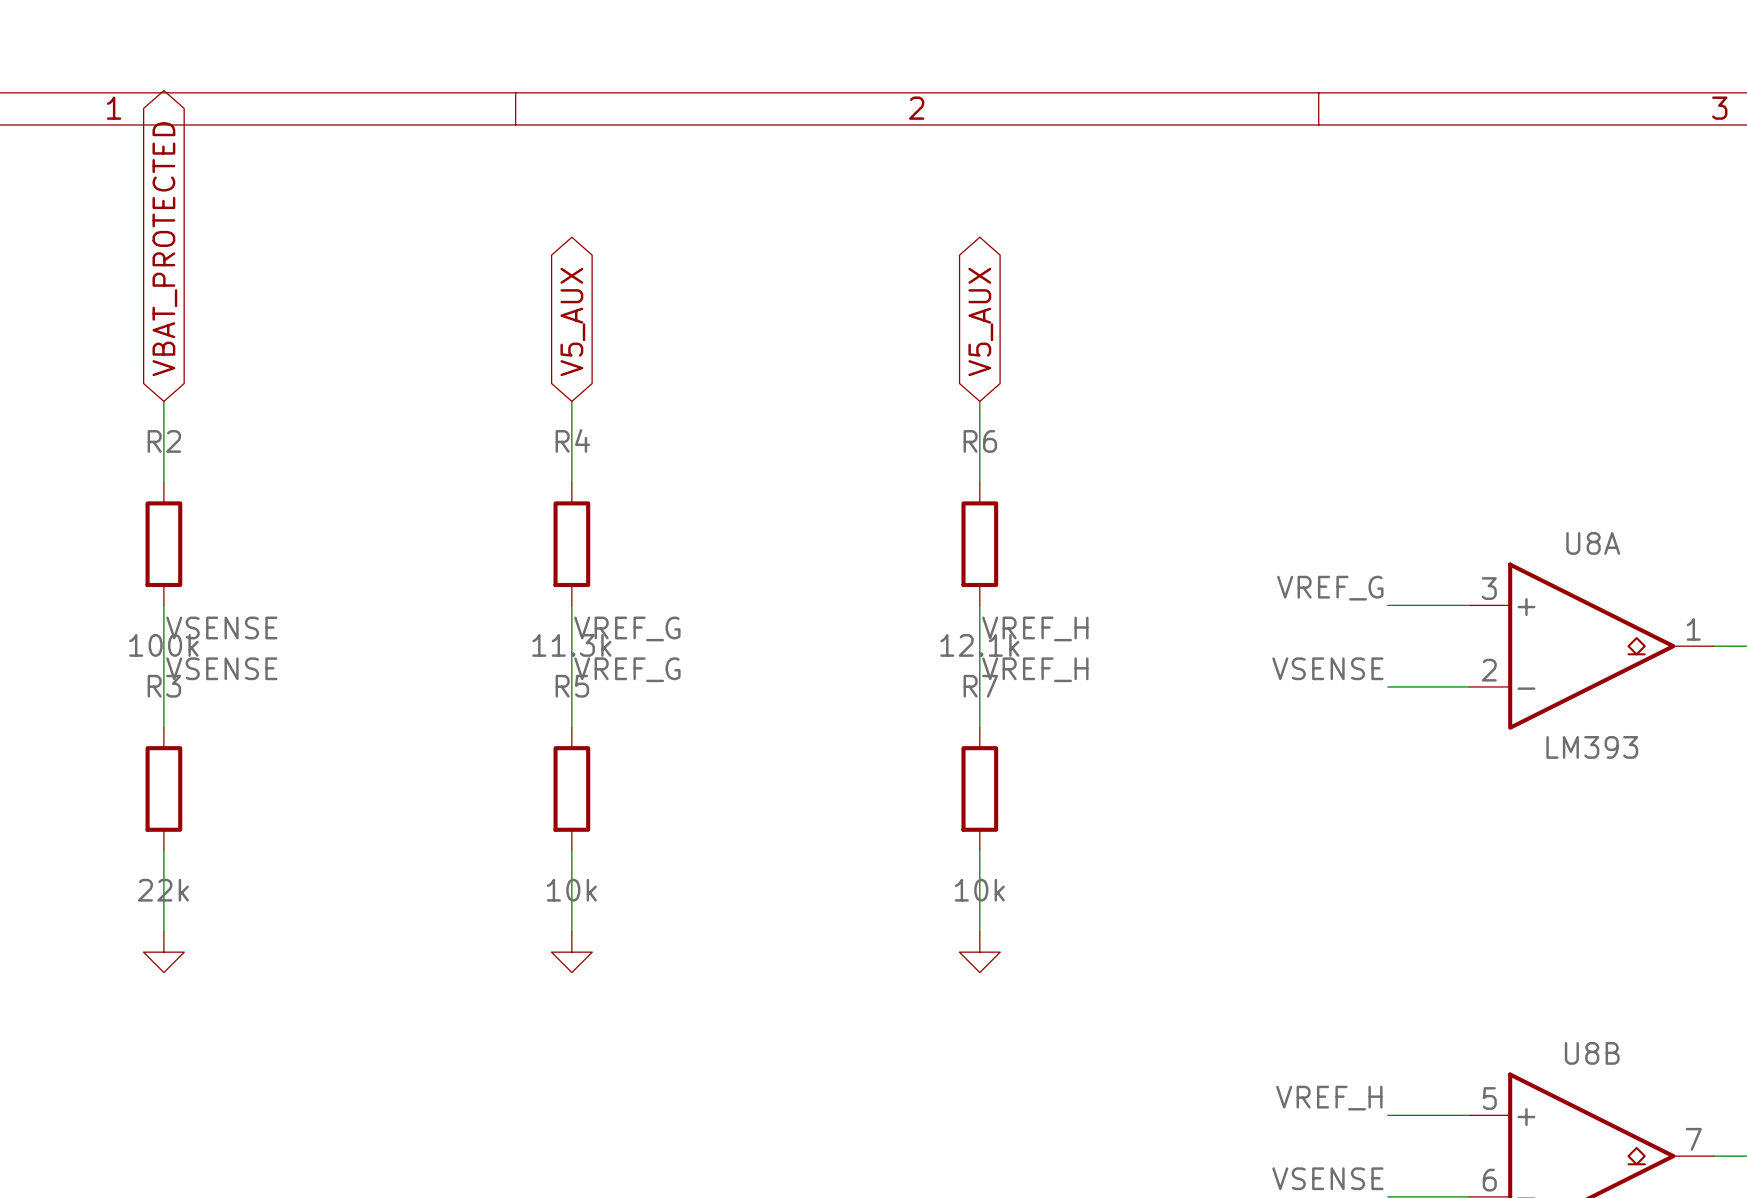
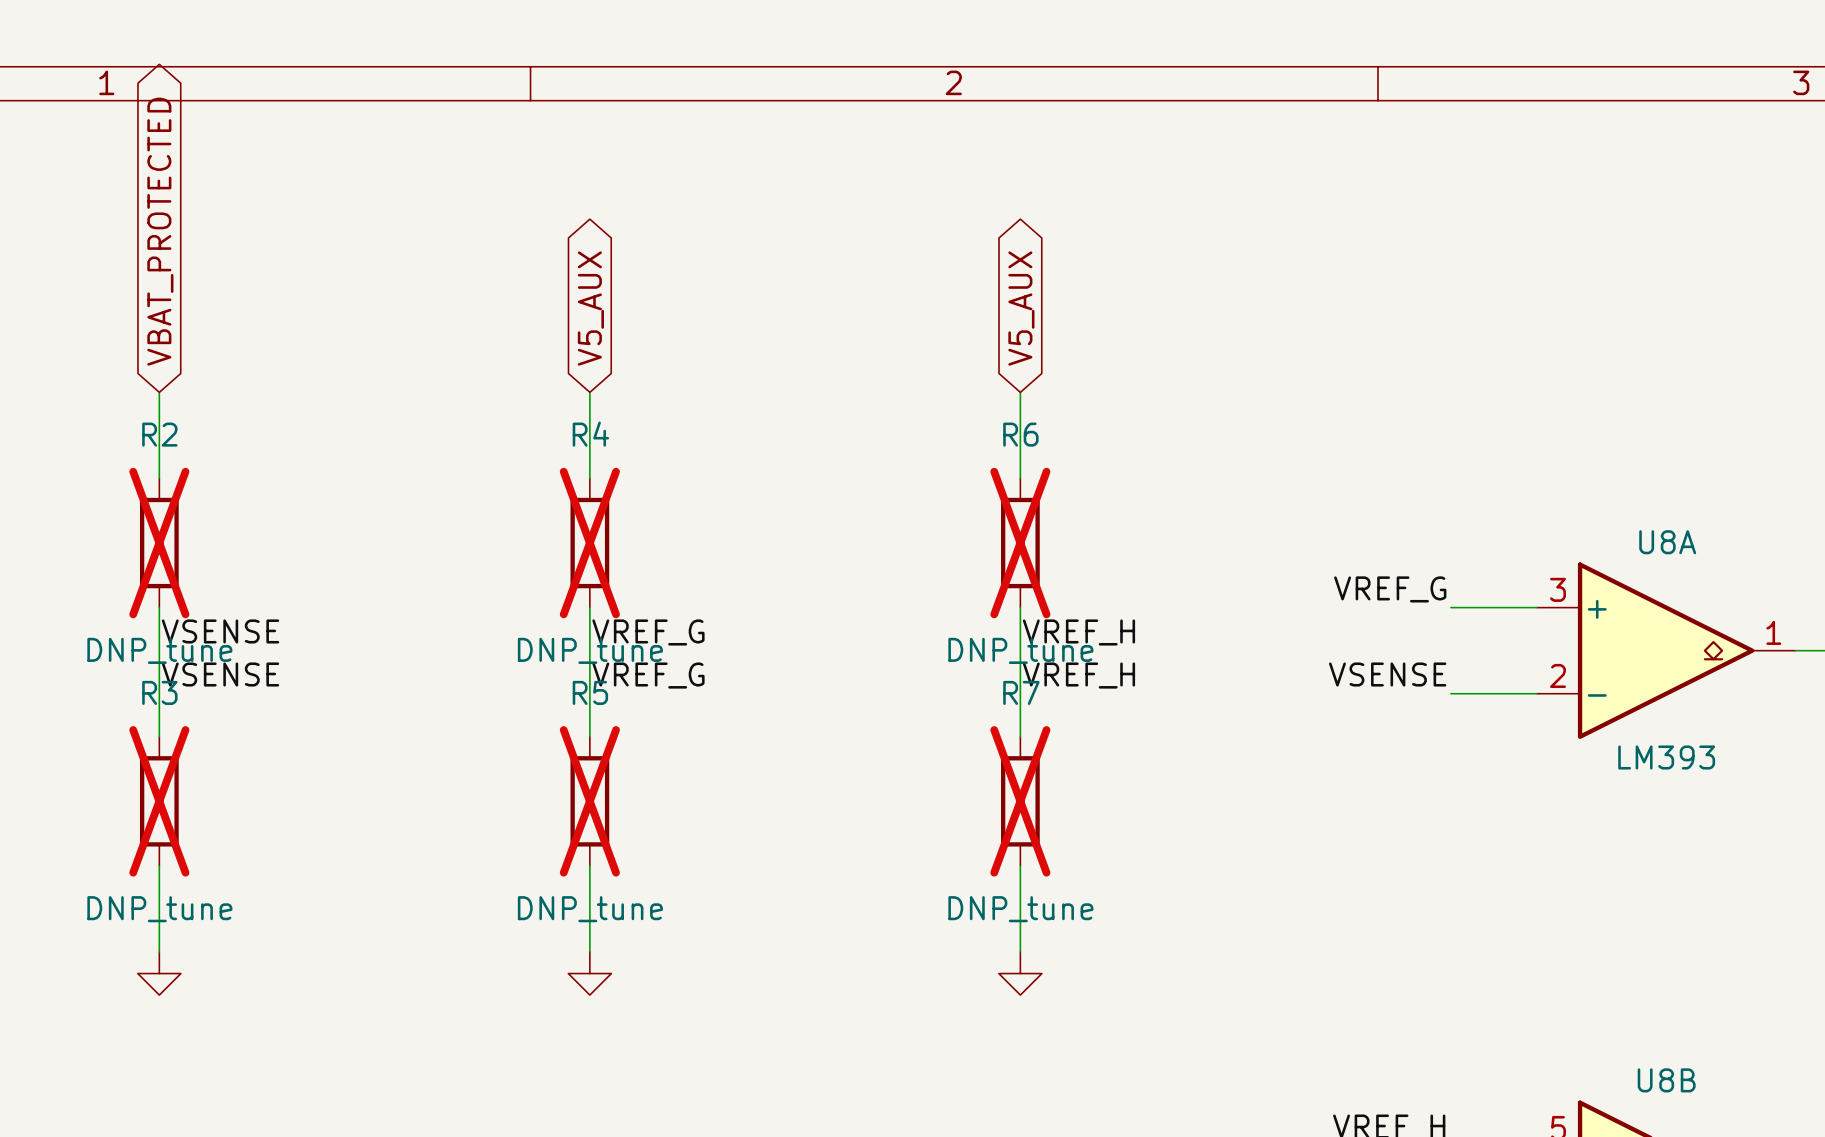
R2 do-not-place cross: none -> (159, 543)
R4 do-not-place cross: none -> (589, 543)
R6 do-not-place cross: none -> (1020, 543)
R2 value: 100k (163, 645) -> DNP_tune (159, 650)
R4 value: 11.3k (571, 645) -> DNP_tune (590, 650)
R6 value: 12.1k (979, 645) -> DNP_tune (1020, 650)
R3 do-not-place cross: none -> (159, 801)
R5 do-not-place cross: none -> (589, 801)
R7 do-not-place cross: none -> (1020, 801)
R3 value: 22k (163, 890) -> DNP_tune (159, 909)
R5 value: 10k (571, 890) -> DNP_tune (590, 909)
R7 value: 10k (979, 890) -> DNP_tune (1020, 909)

